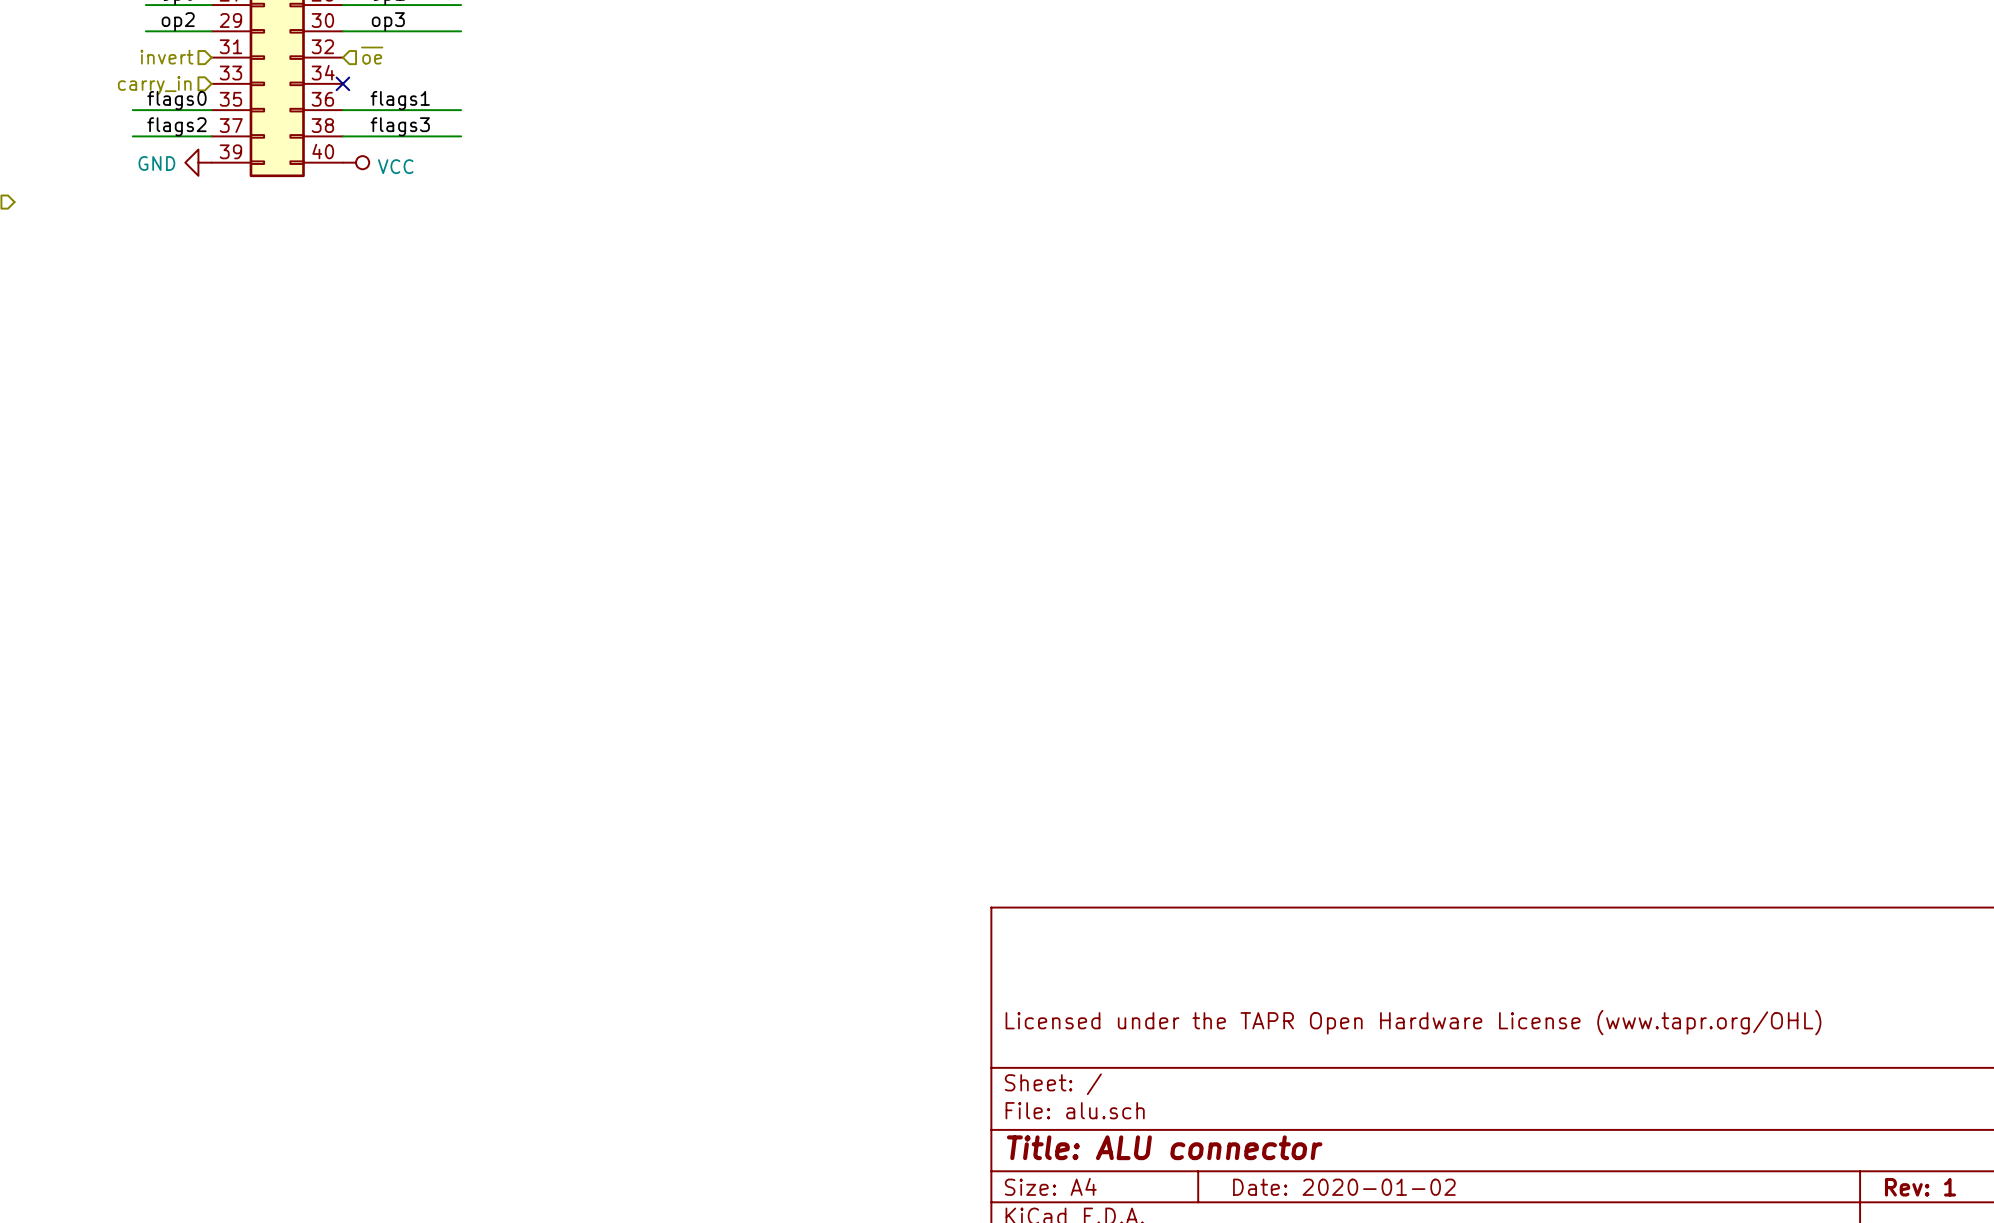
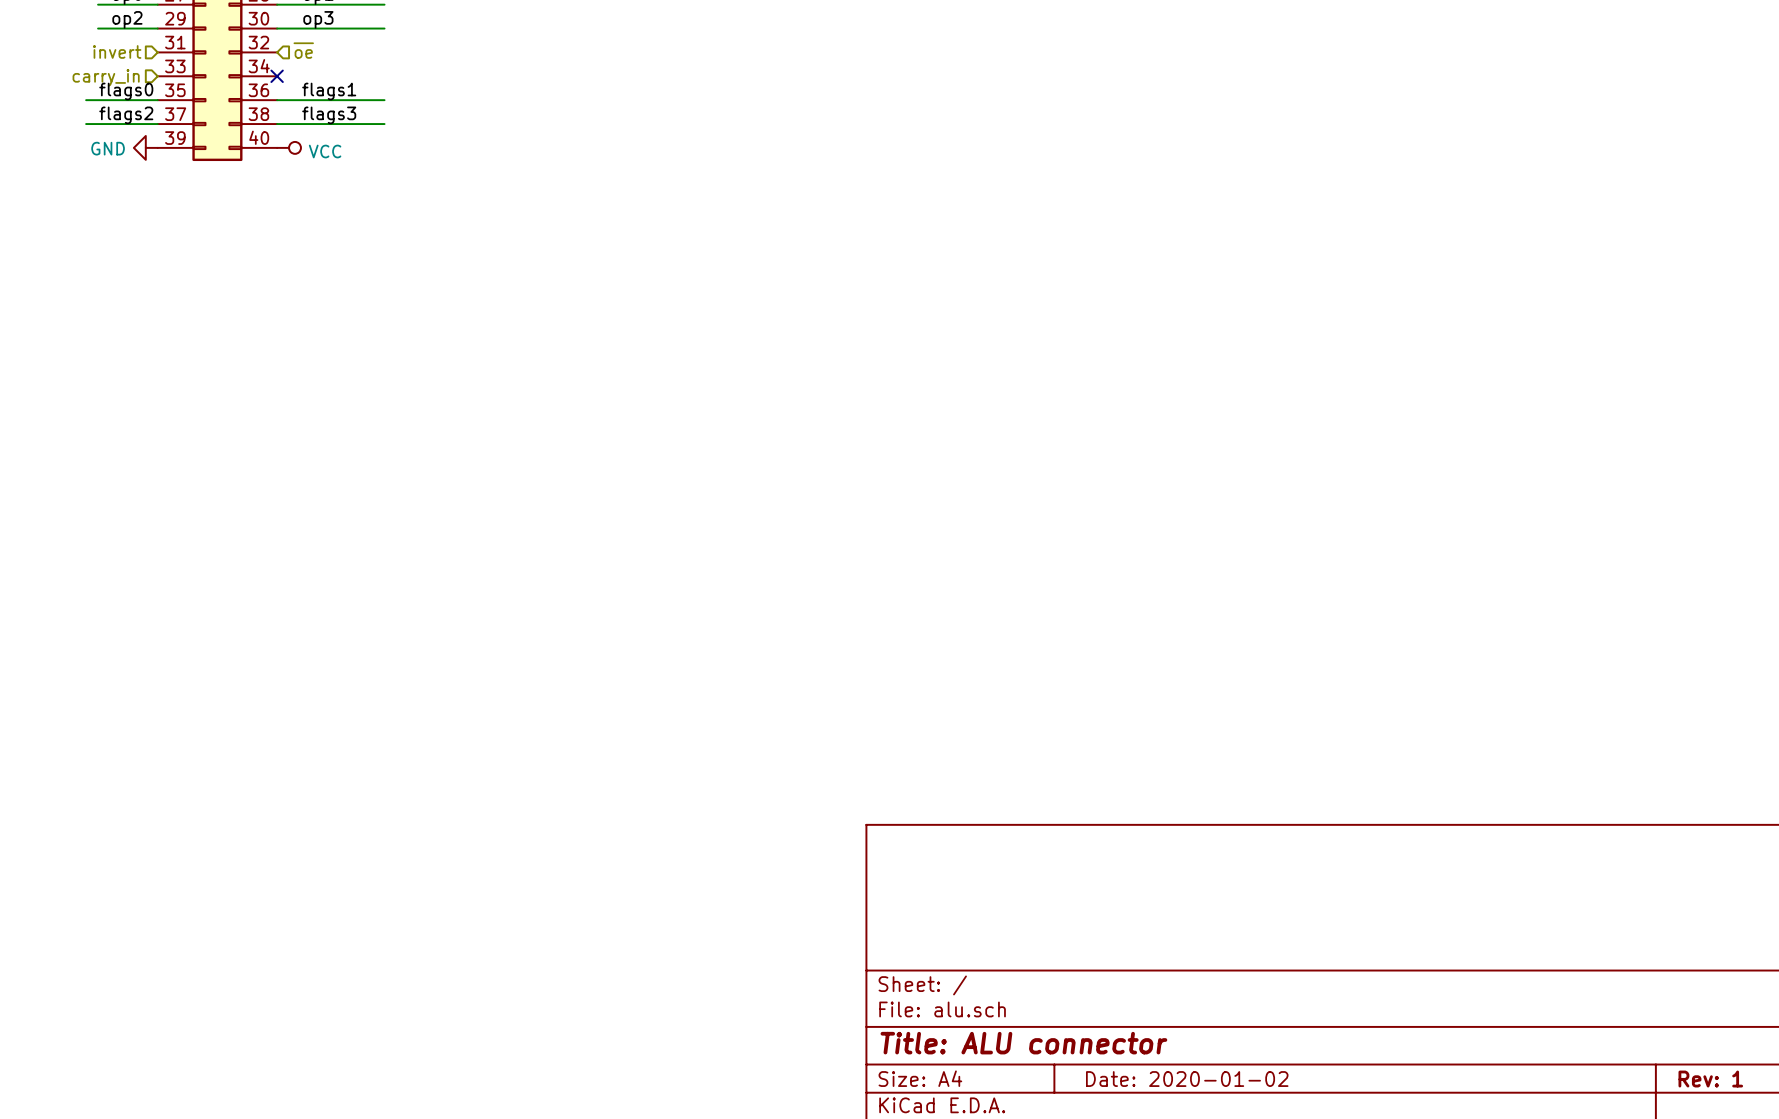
title block: Licensed under the TAPR Open Hardware License (www.tapr.org/OHL) (1413, 1022) -> none

